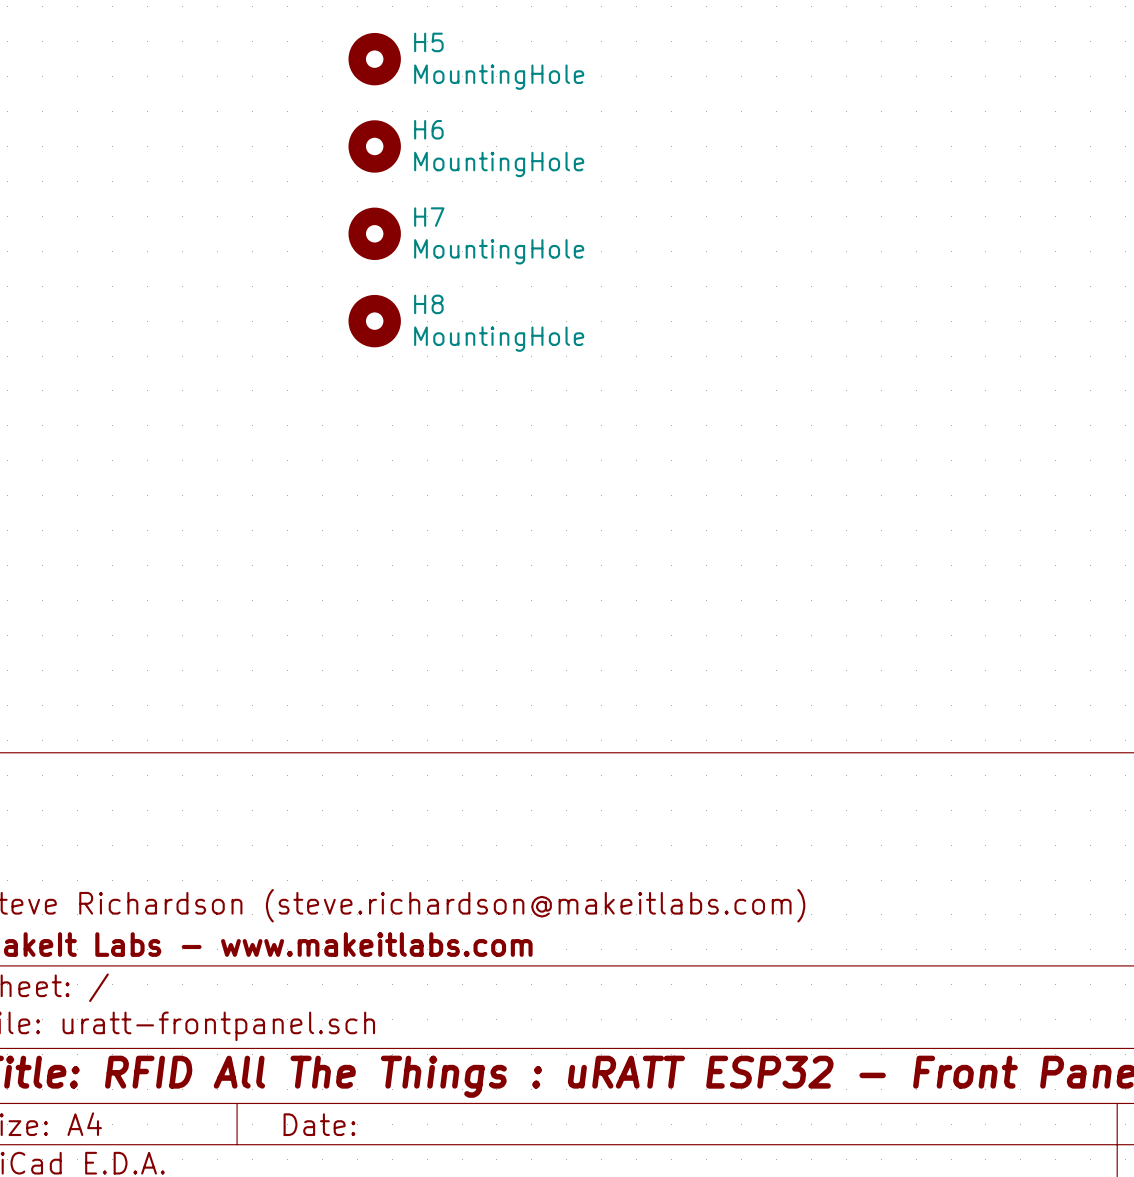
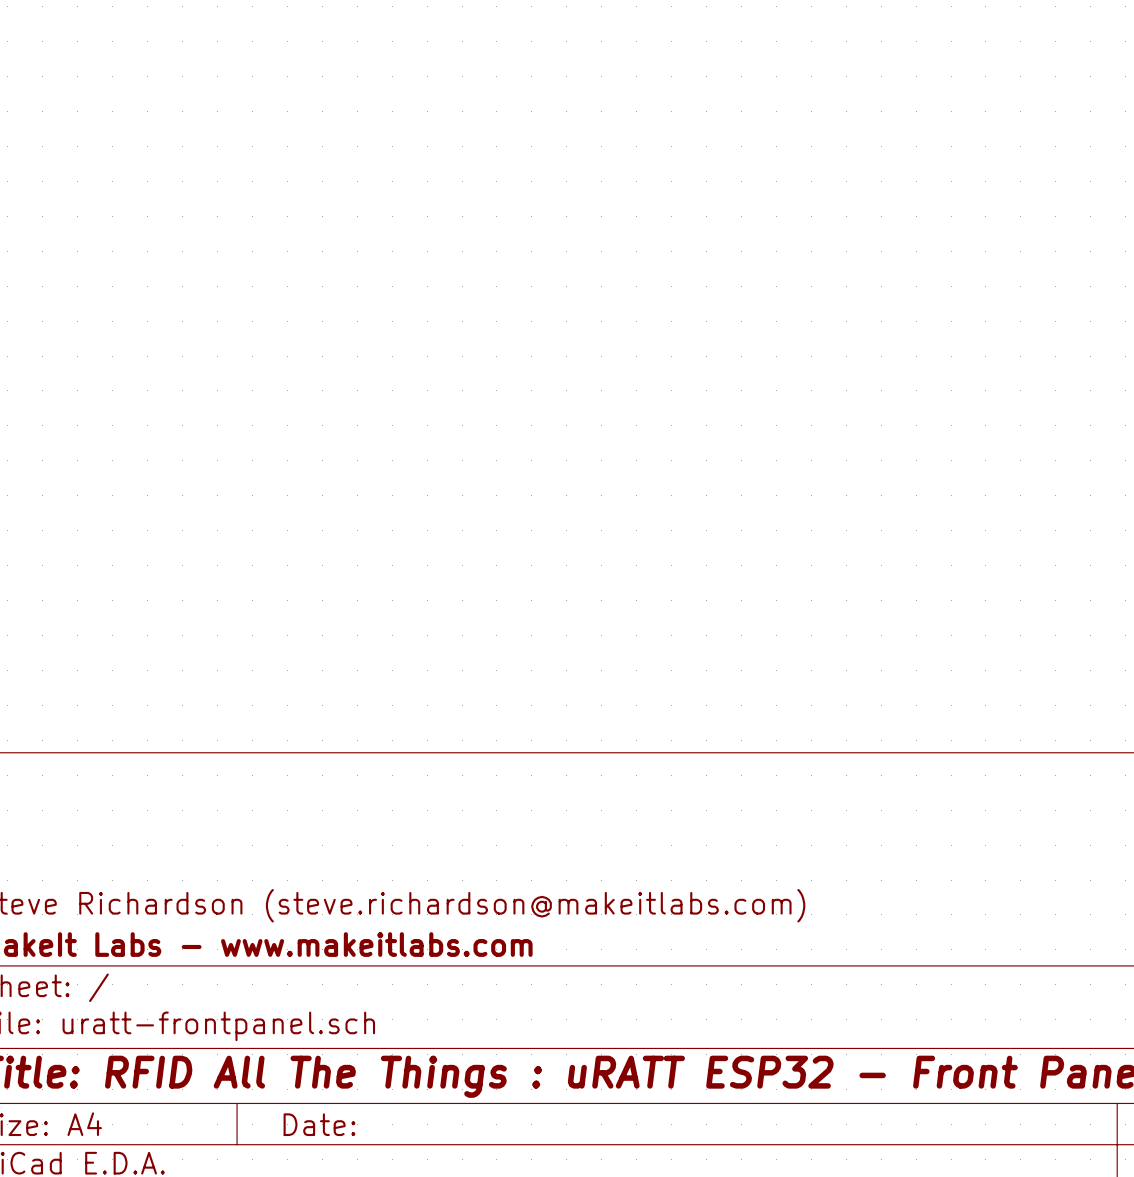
H5: MountingHole (374, 59) -> none
H6: MountingHole (374, 146) -> none
H7: MountingHole (374, 233) -> none
H8: MountingHole (374, 321) -> none

